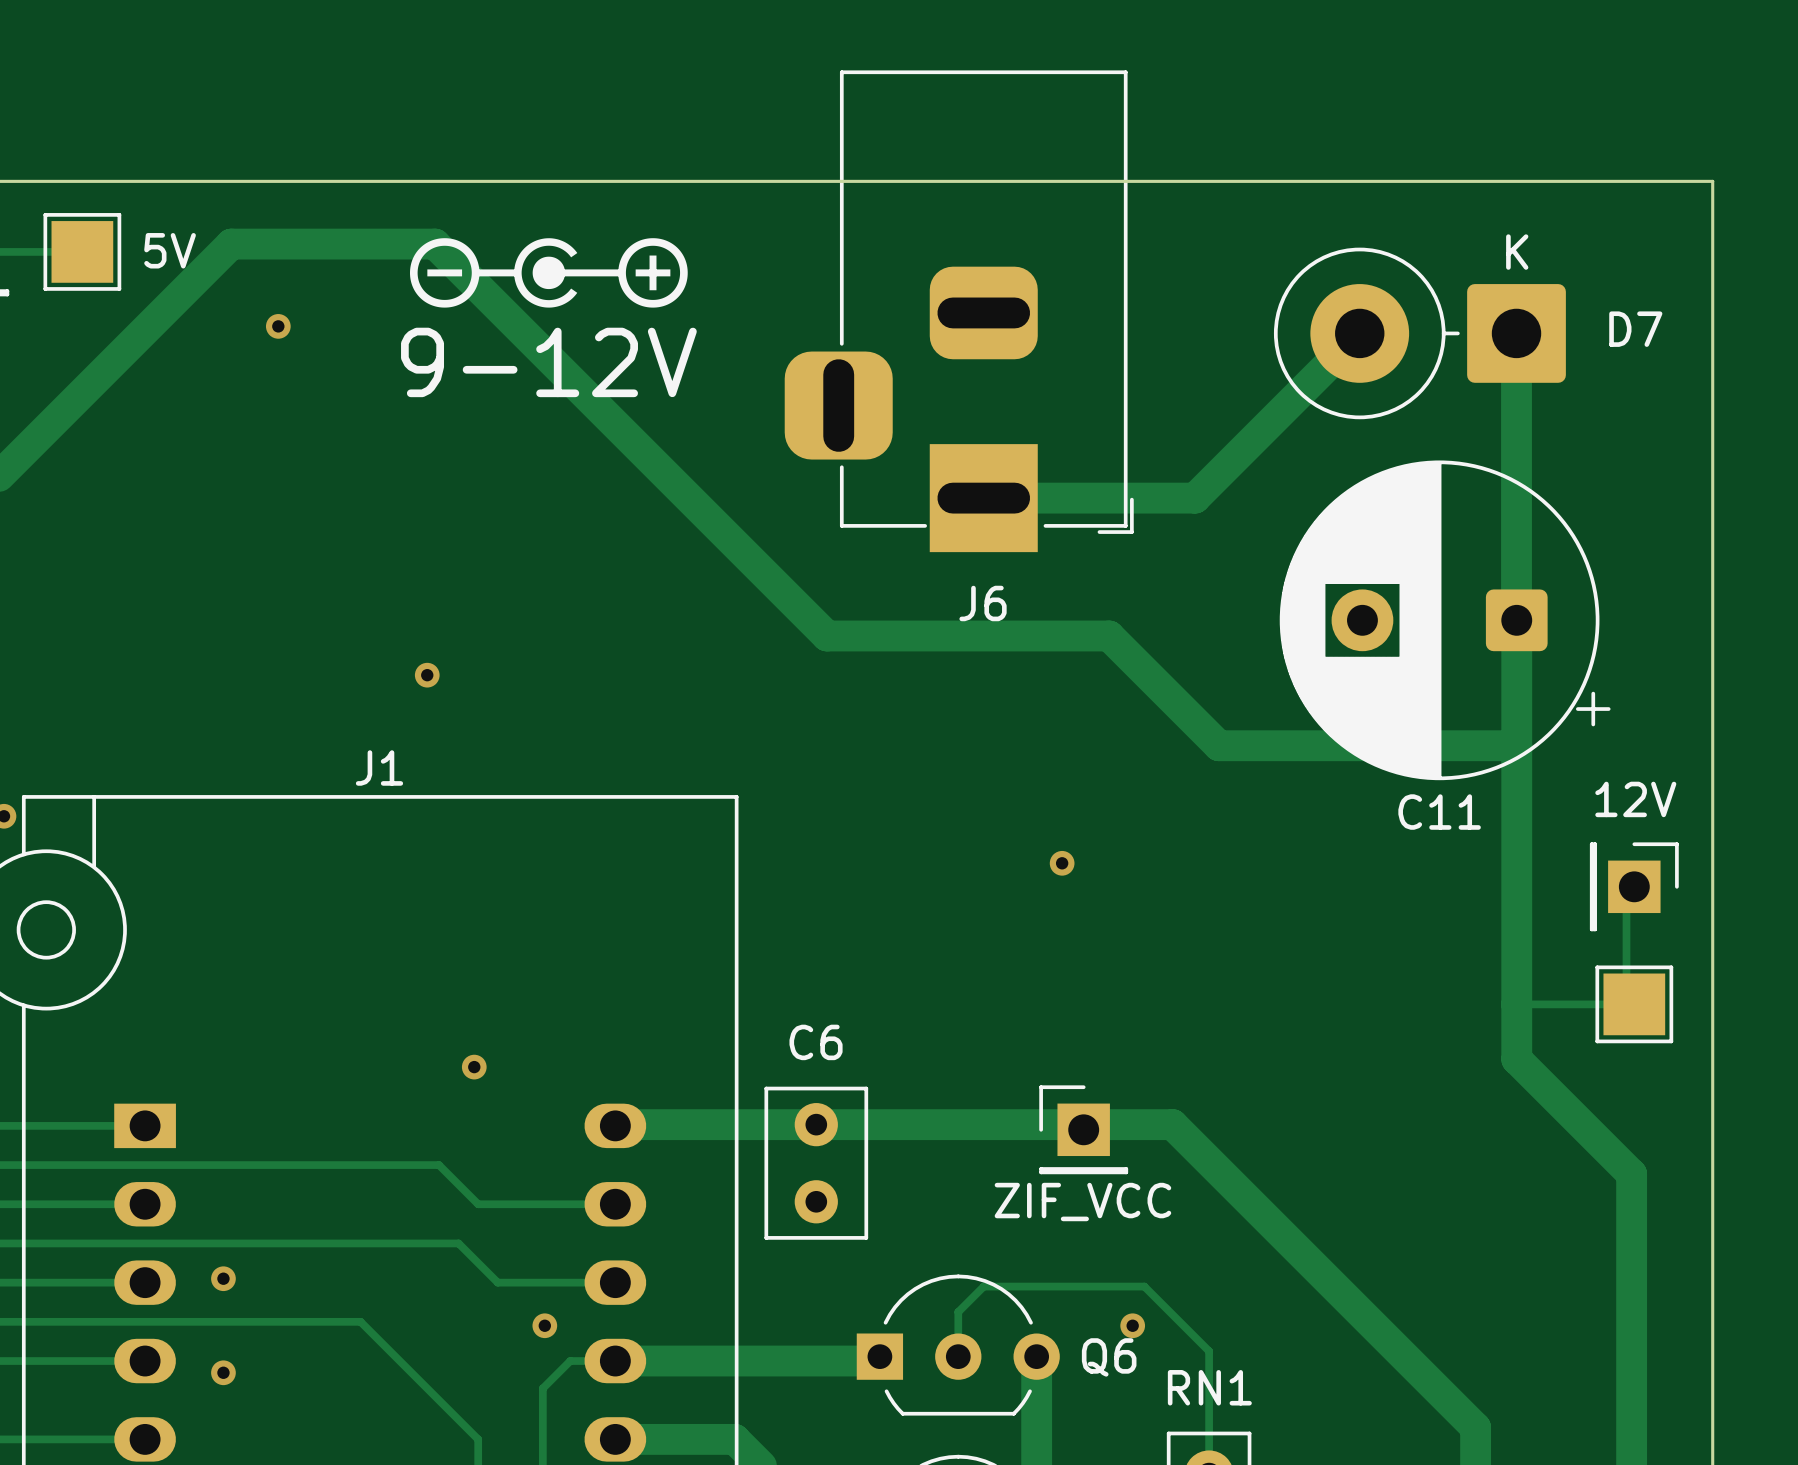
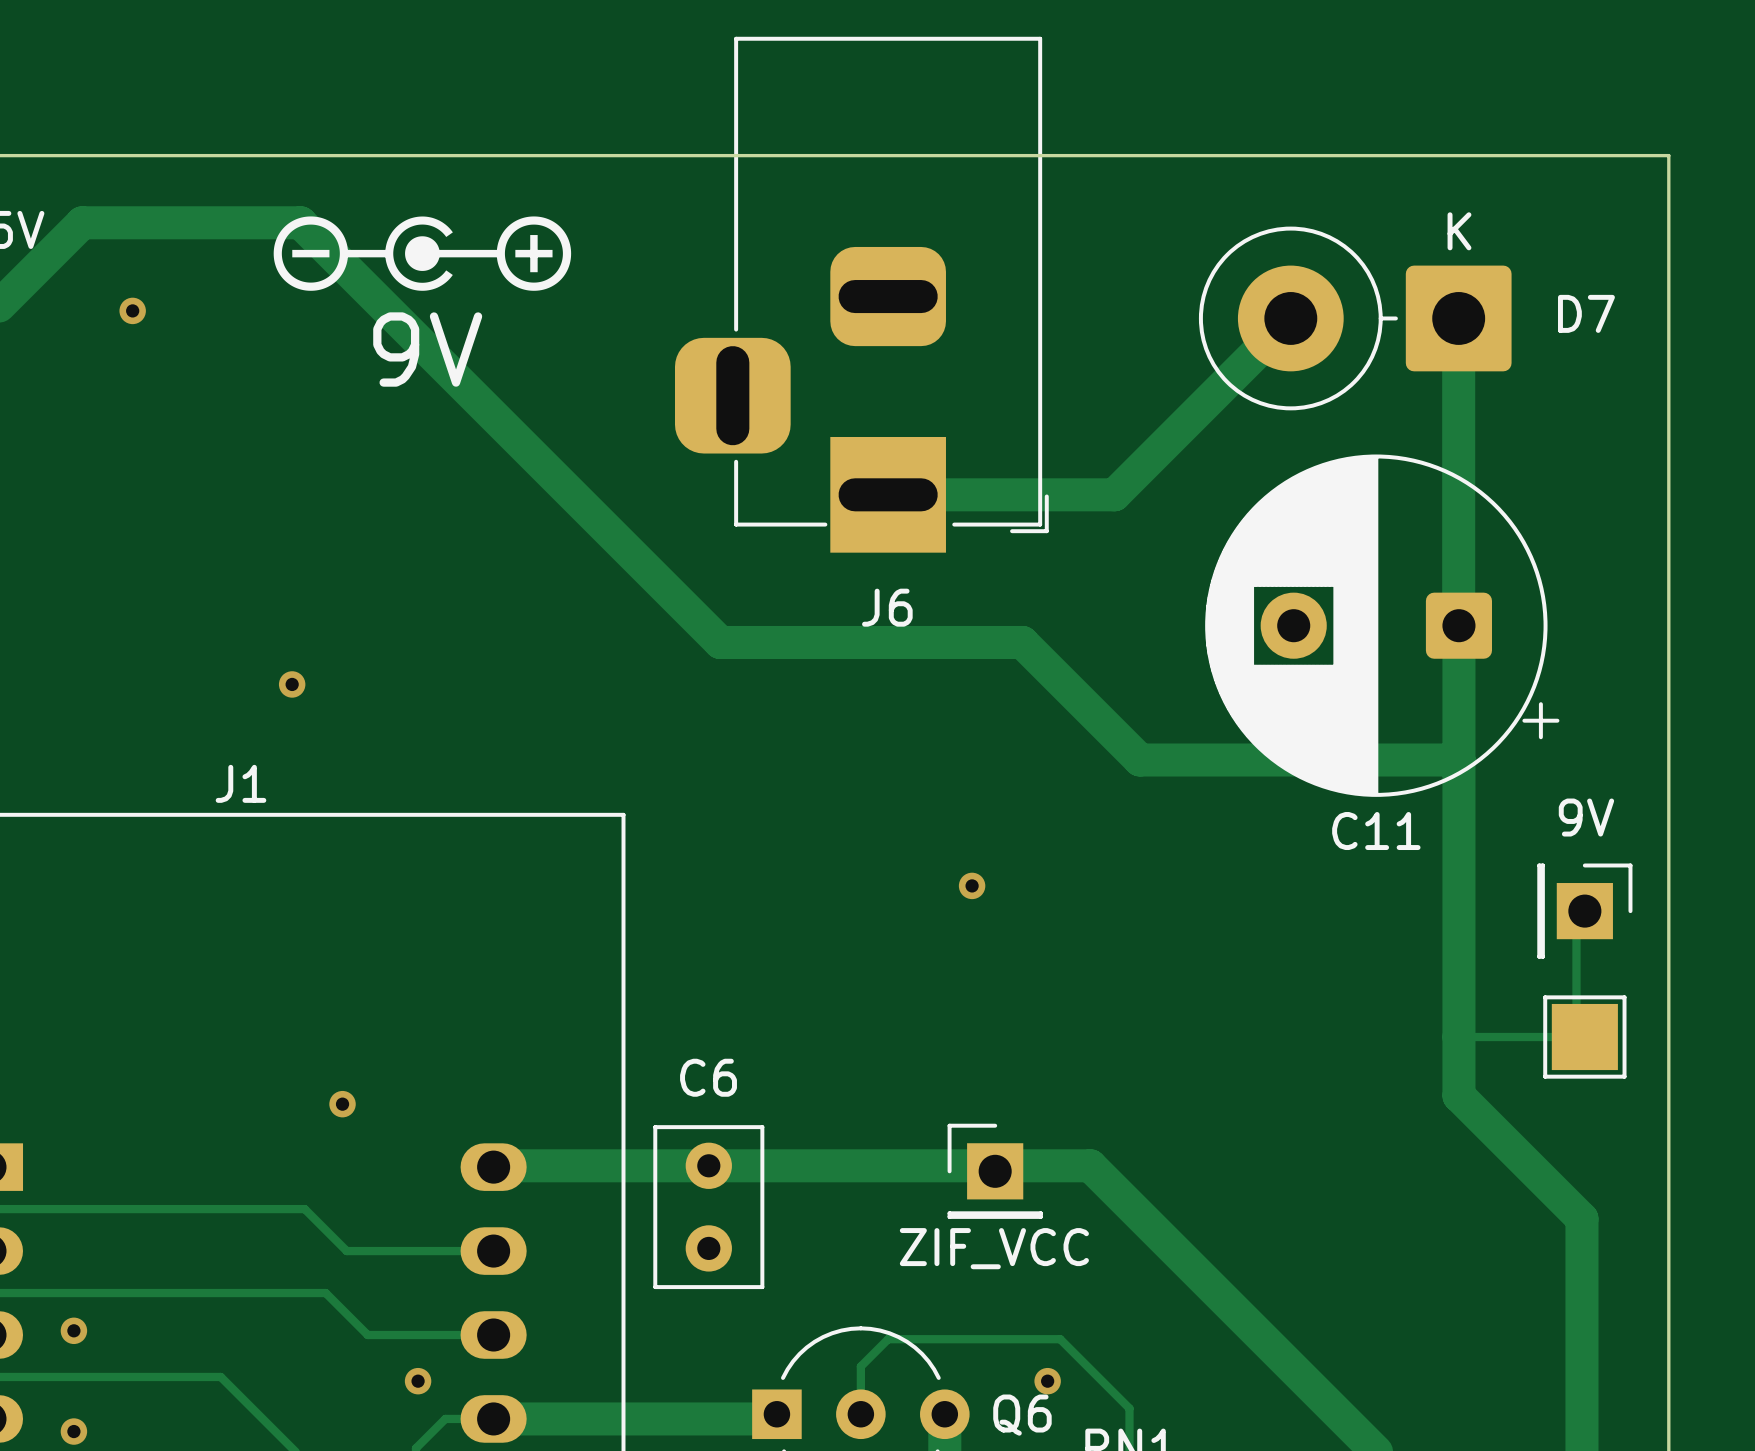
text: 9-12V (548, 362) -> none
text: none -> 9V (427, 349)
part value: 12V (1635, 799) -> 9V (1586, 817)

